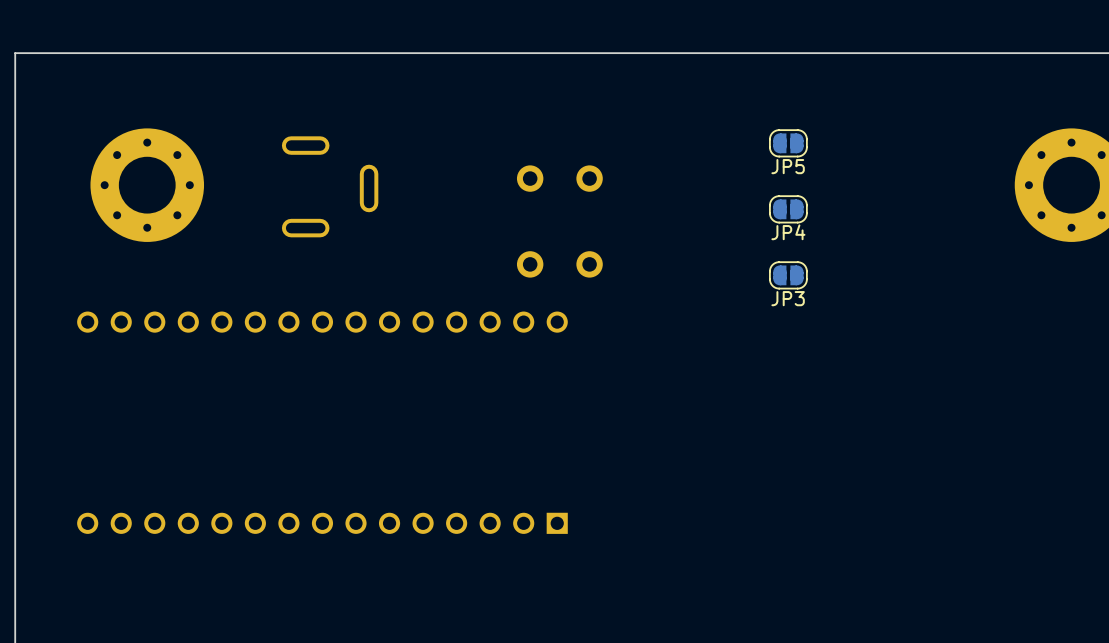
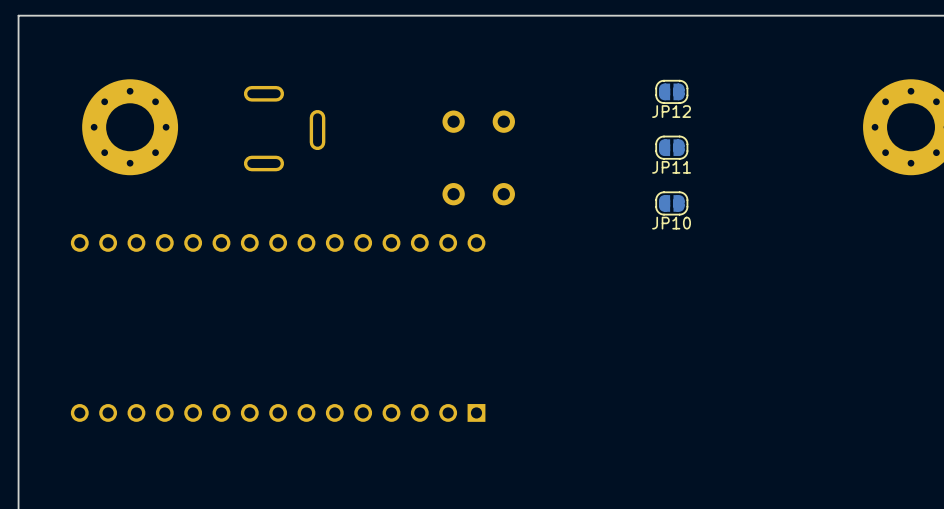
JP5 name: JP5 (788, 166) -> JP12 (671, 111)
JP4 name: JP4 (788, 232) -> JP11 (671, 167)
JP3 name: JP3 (788, 298) -> JP10 (671, 223)

